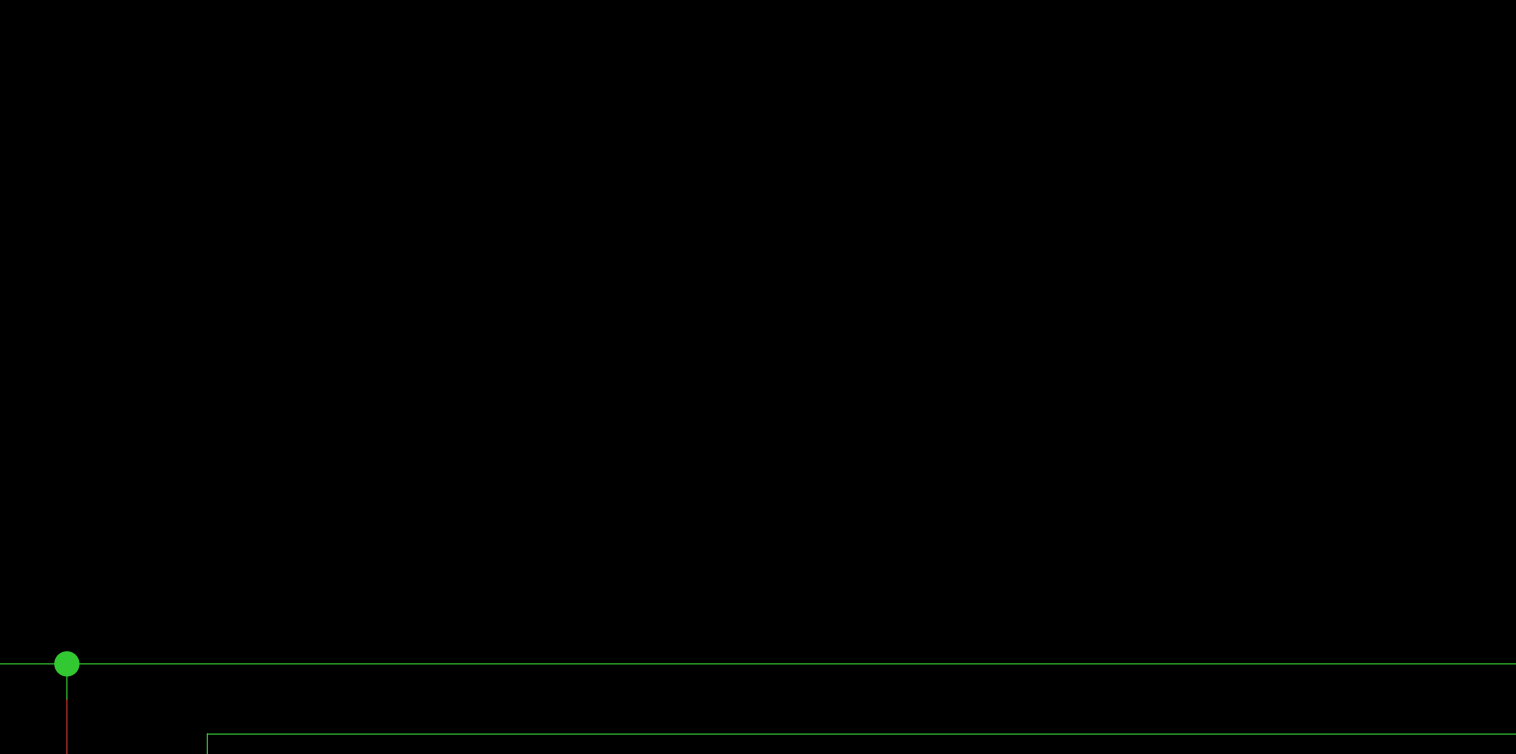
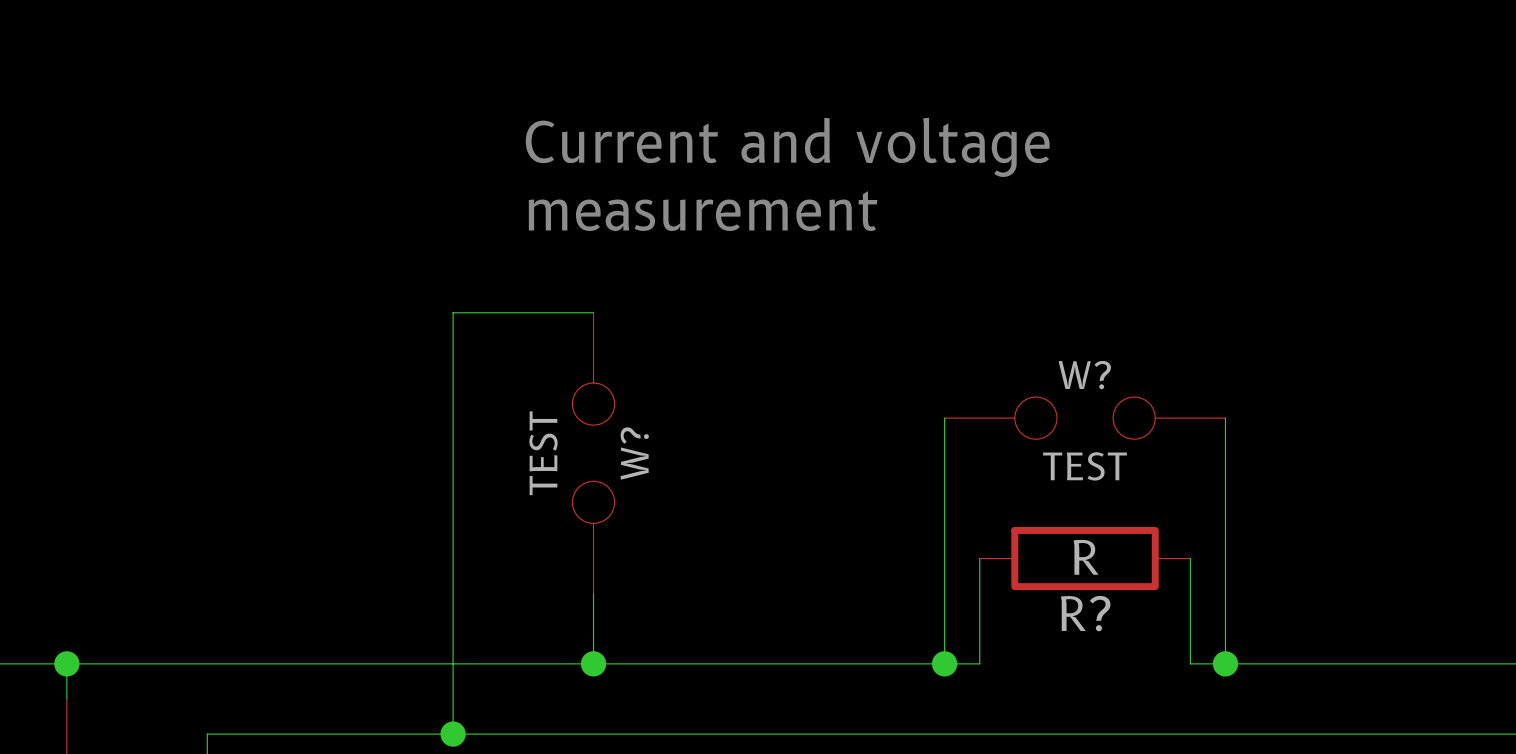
text: none -> Current and voltage (787, 147)
text: none -> measurement (703, 211)
wire: none -> (593, 312) (453, 312) (453, 734)
wire: none -> (944, 418) (944, 663)
W?: none -> TEST (1085, 418)
wire: none -> (1225, 418) (1225, 663)
W?: none -> TEST (593, 453)
R?: none -> R (1085, 558)
wire: none -> (1190, 558) (1190, 663)
wire: none -> (593, 593) (593, 663)
junction: none -> (593, 663)
junction: none -> (944, 663)
wire: (979, 663) (1190, 663) -> (979, 663) (979, 558)
junction: none -> (1225, 663)
junction: none -> (453, 734)

